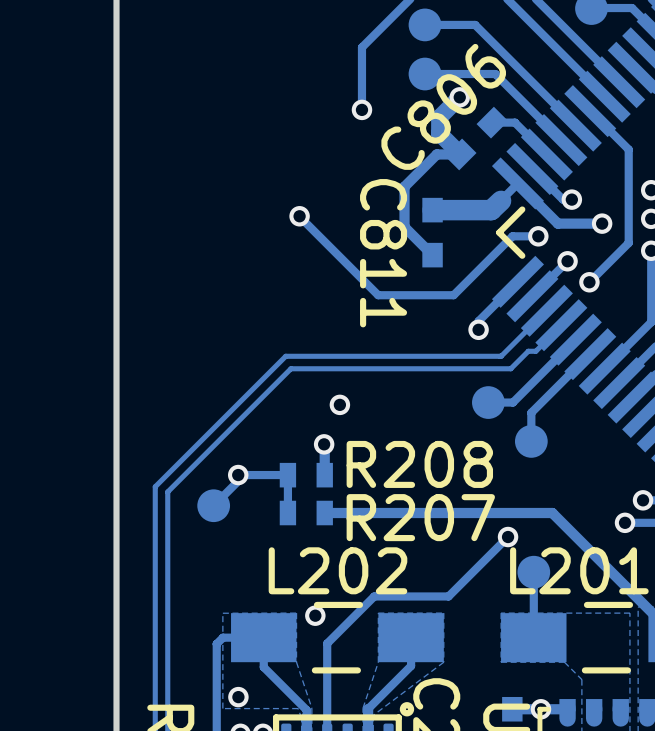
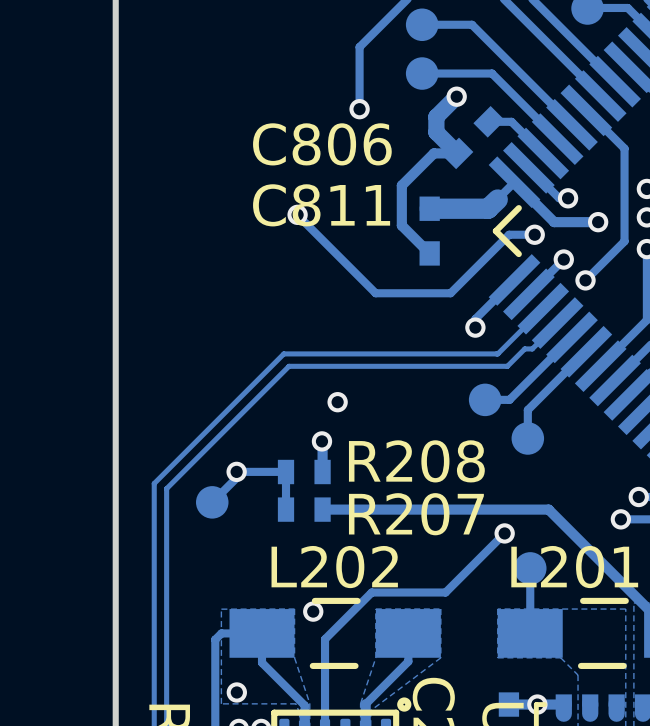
C806 name rotation: 0° (443, 106) -> 45° clockwise (322, 144)
C811 name rotation: 0° (383, 253) -> 90° counterclockwise (321, 205)

